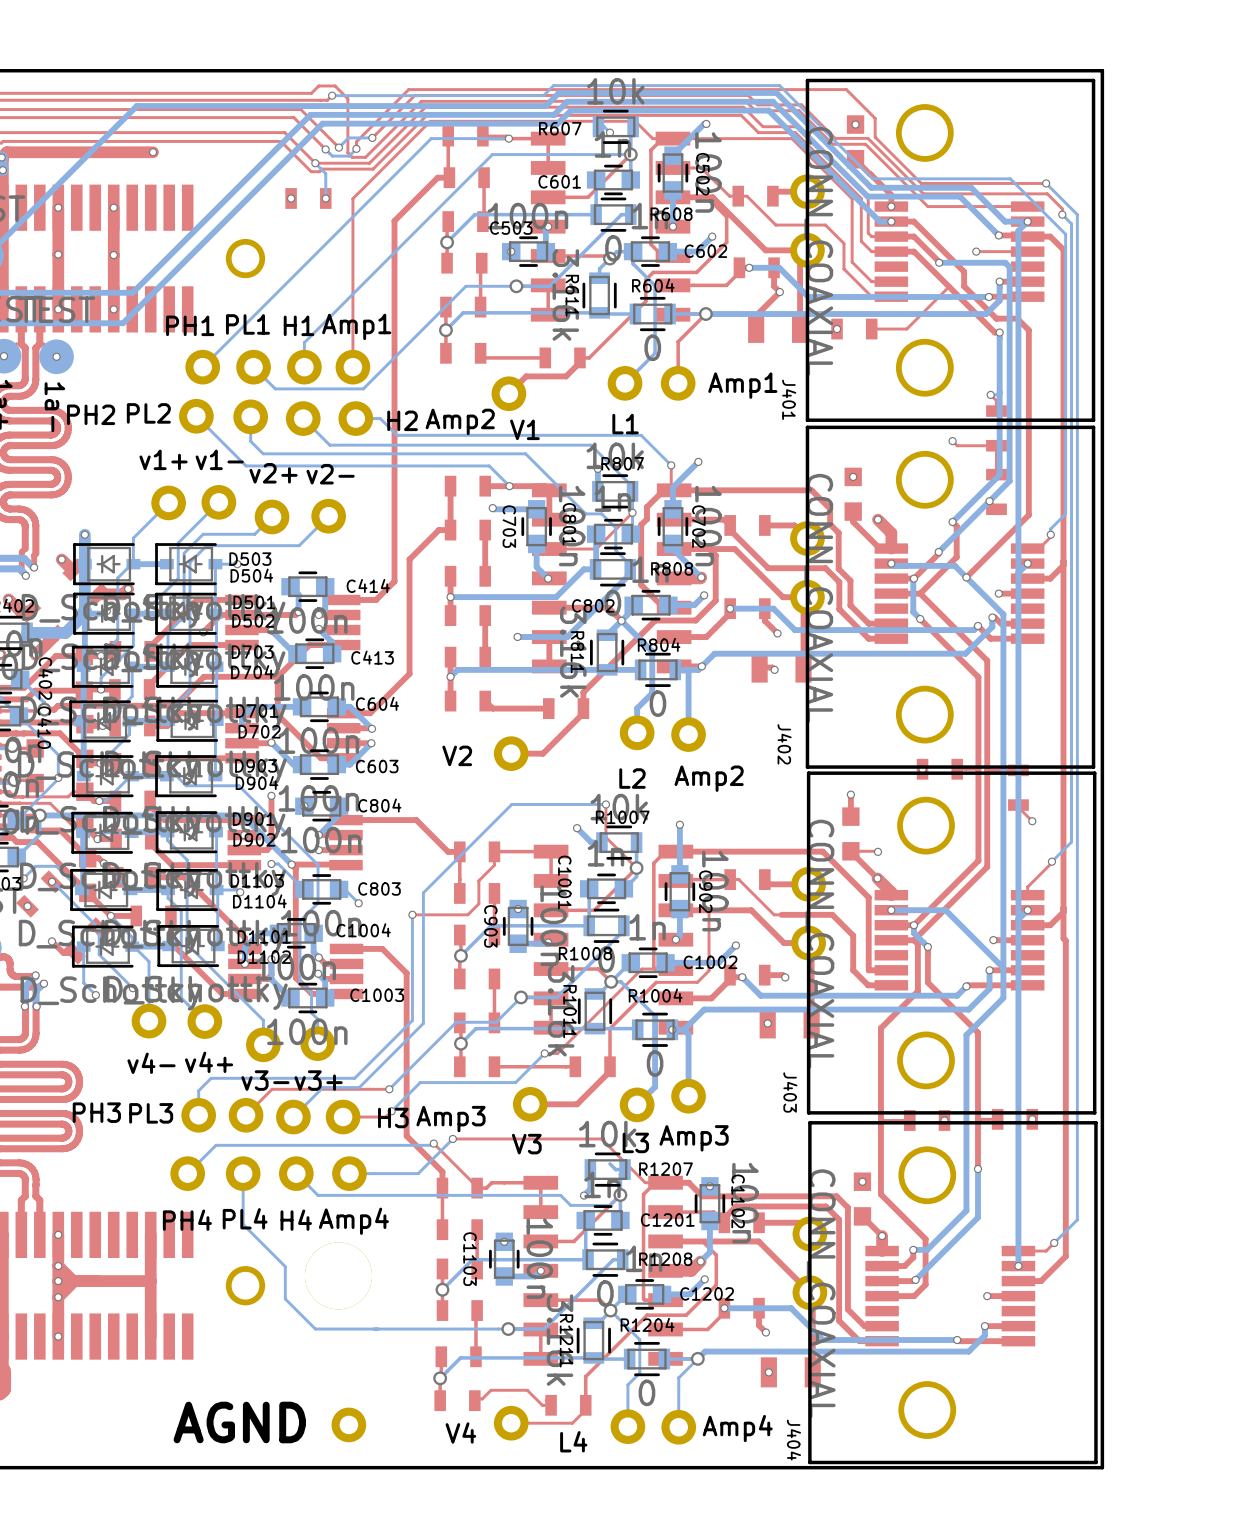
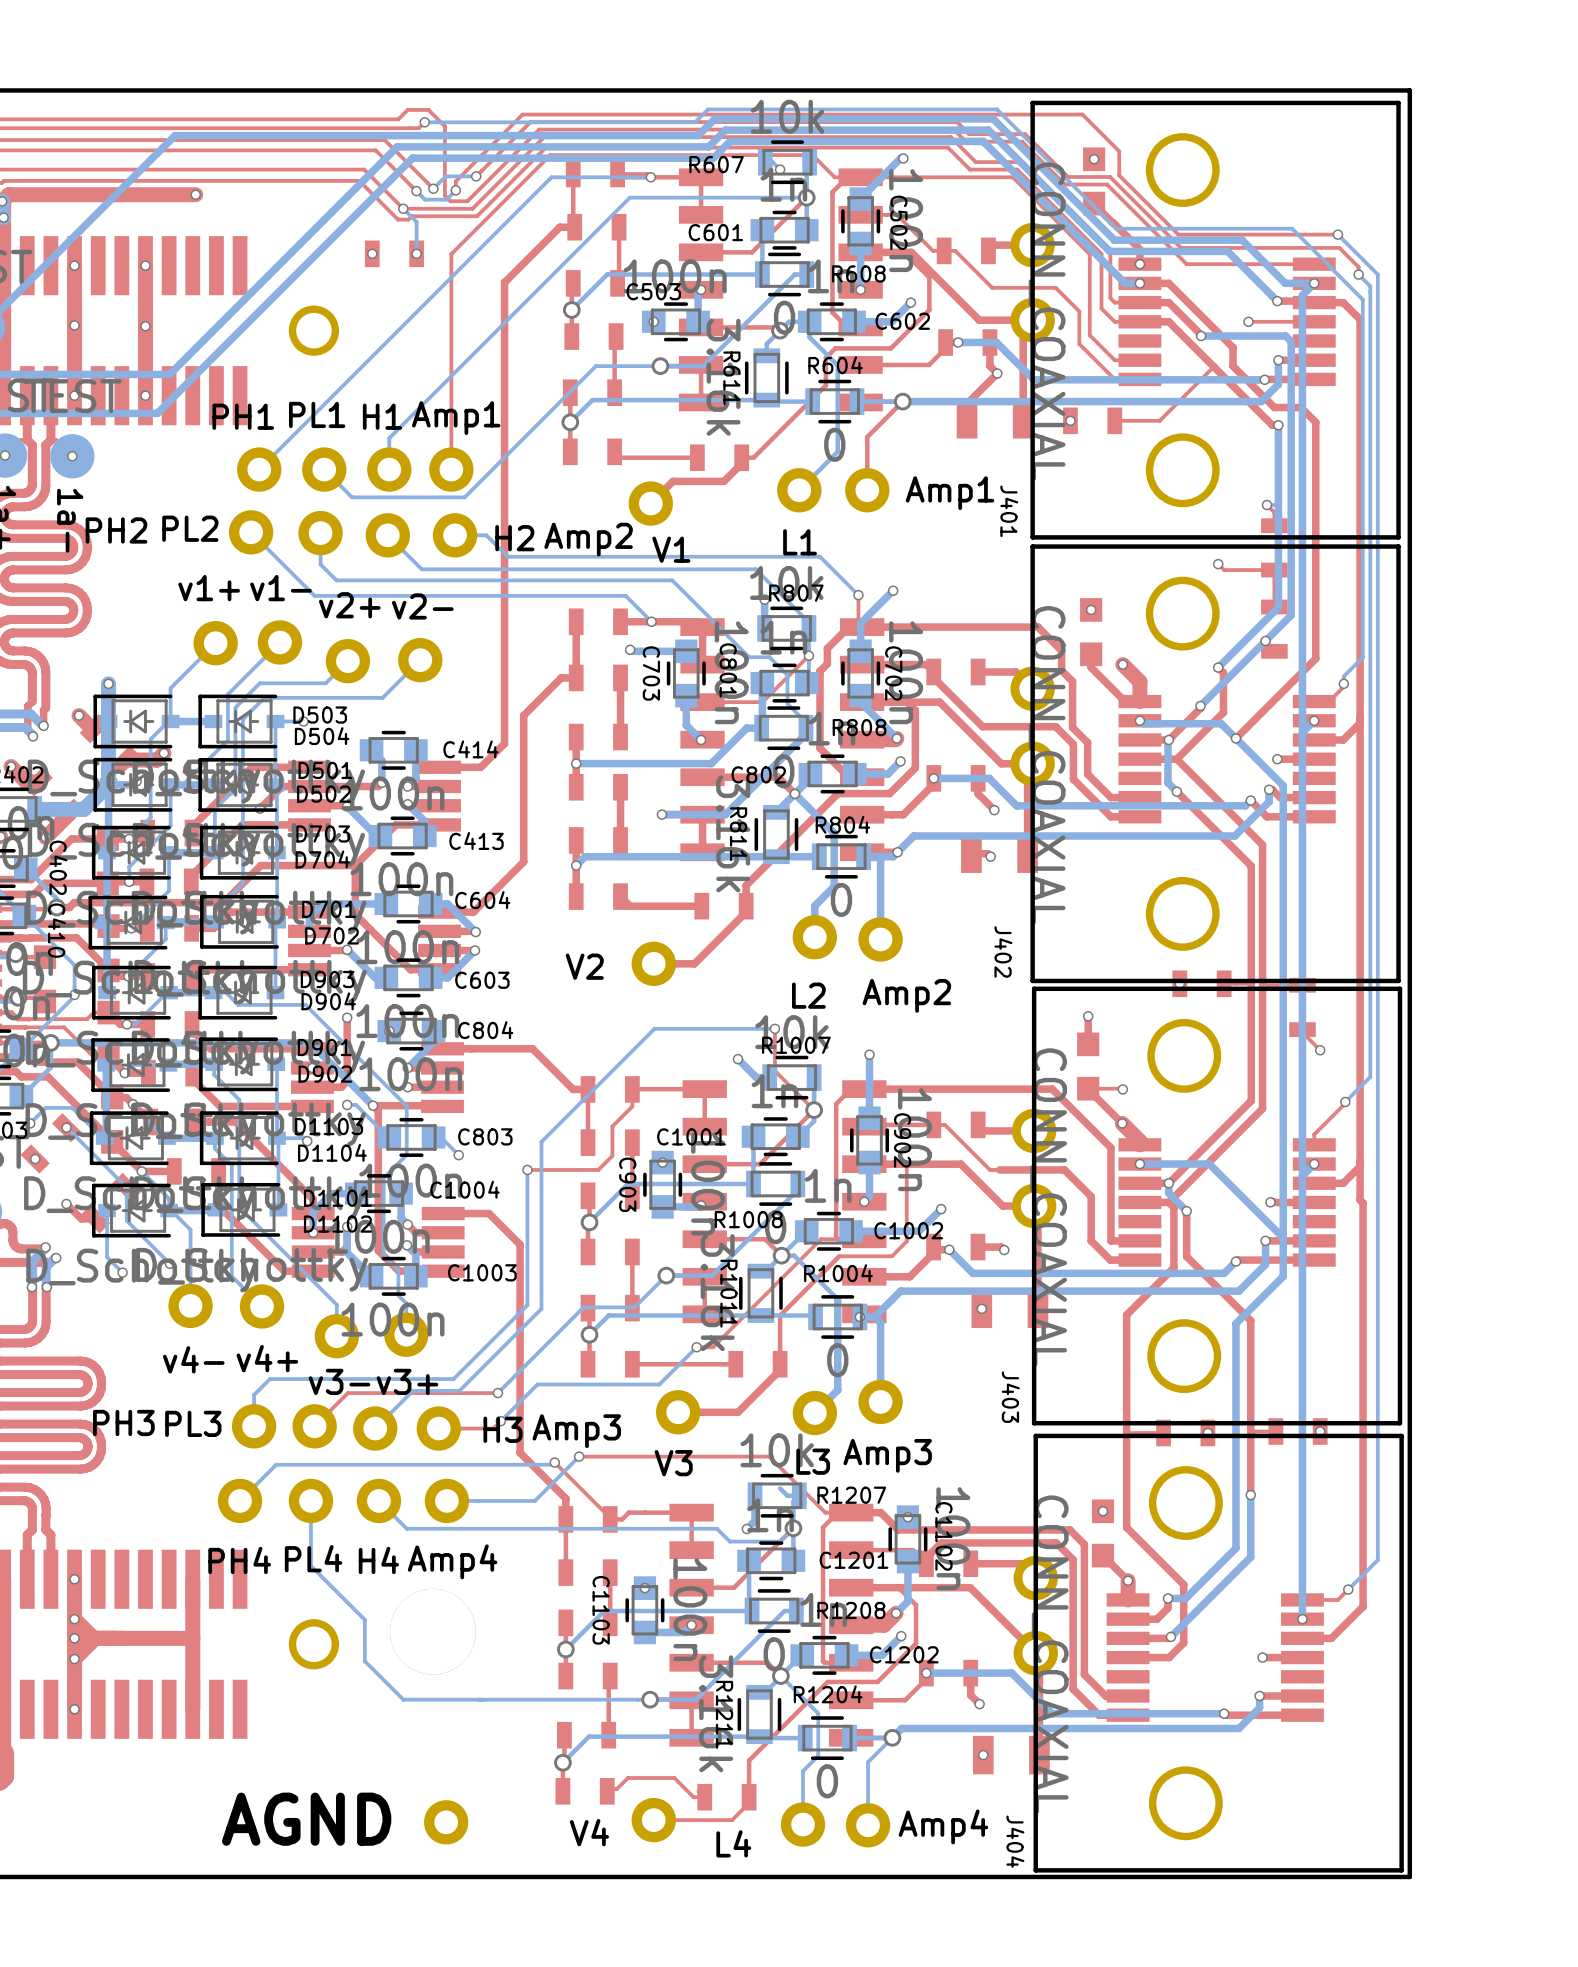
C1001 name rotation: 0° (564, 882) -> 90° counterclockwise (691, 1136)

